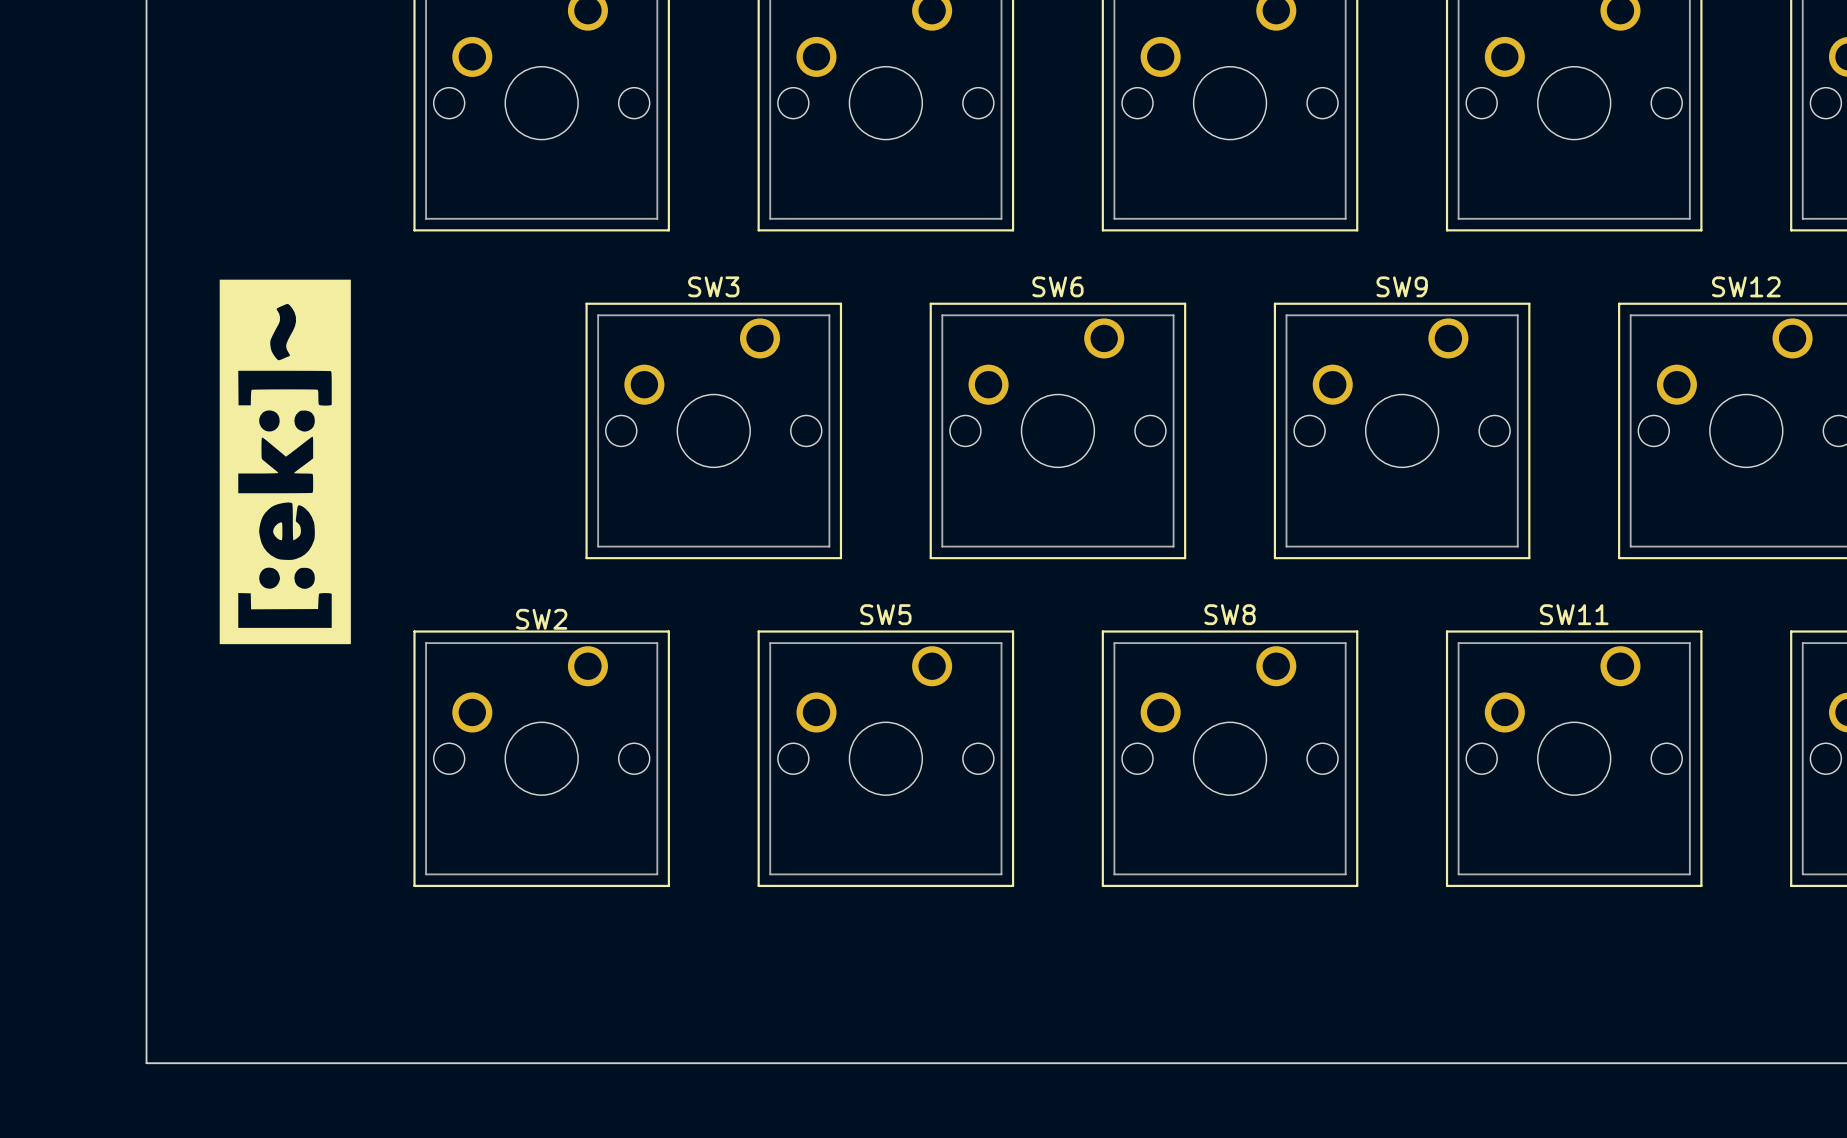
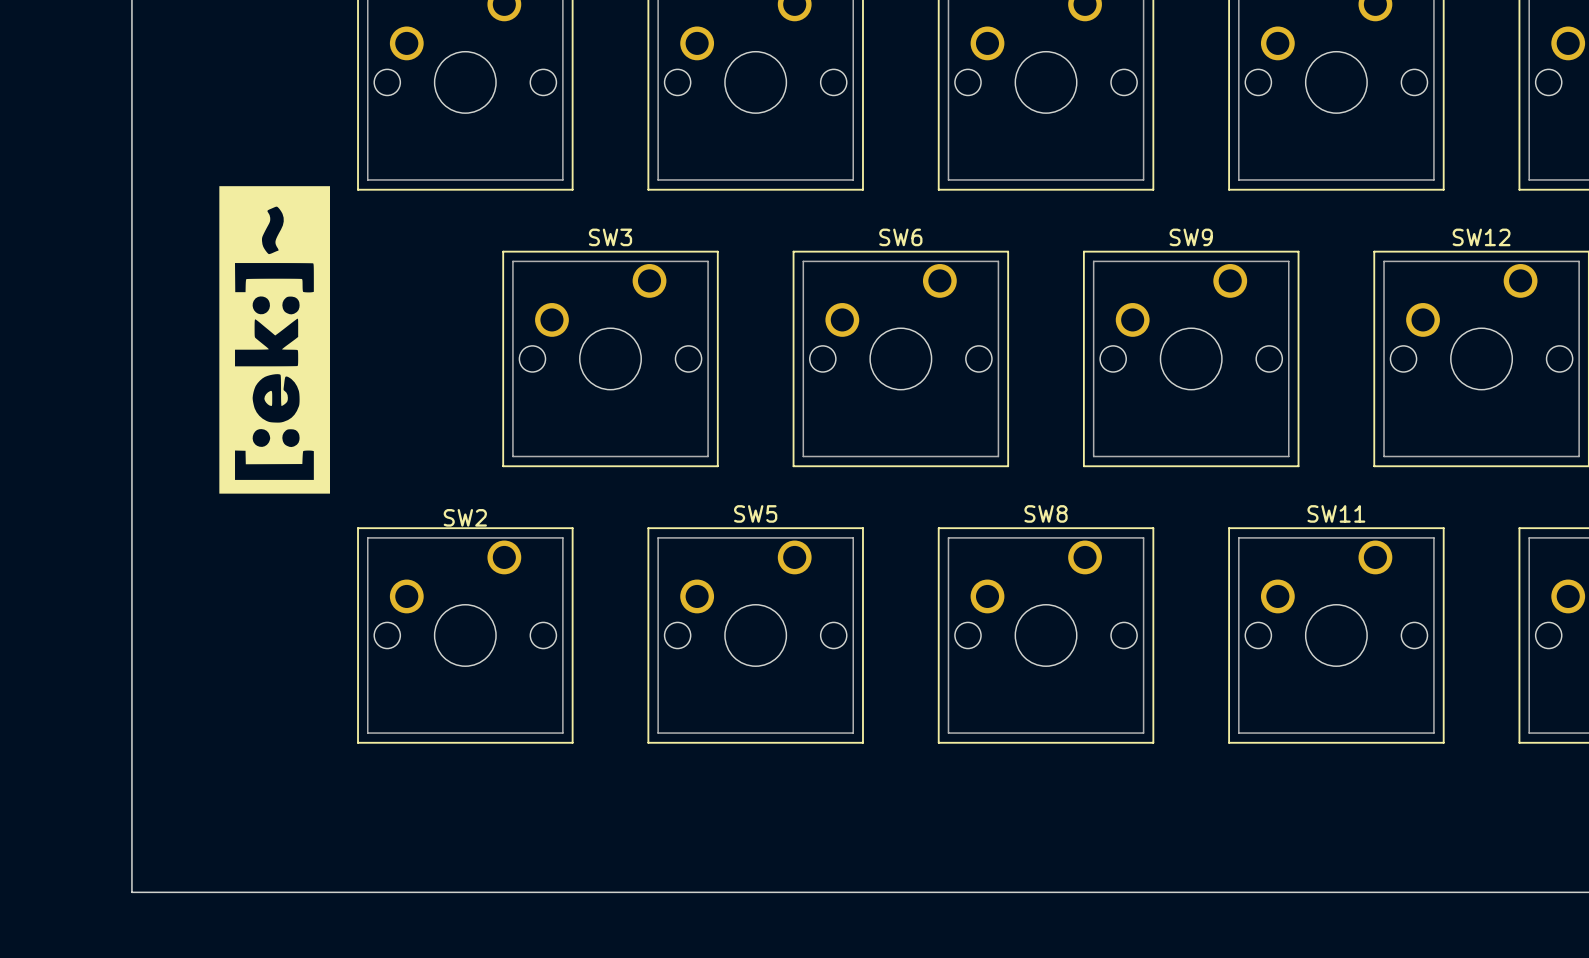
drawing position: (285, 461) -> (274, 339)

